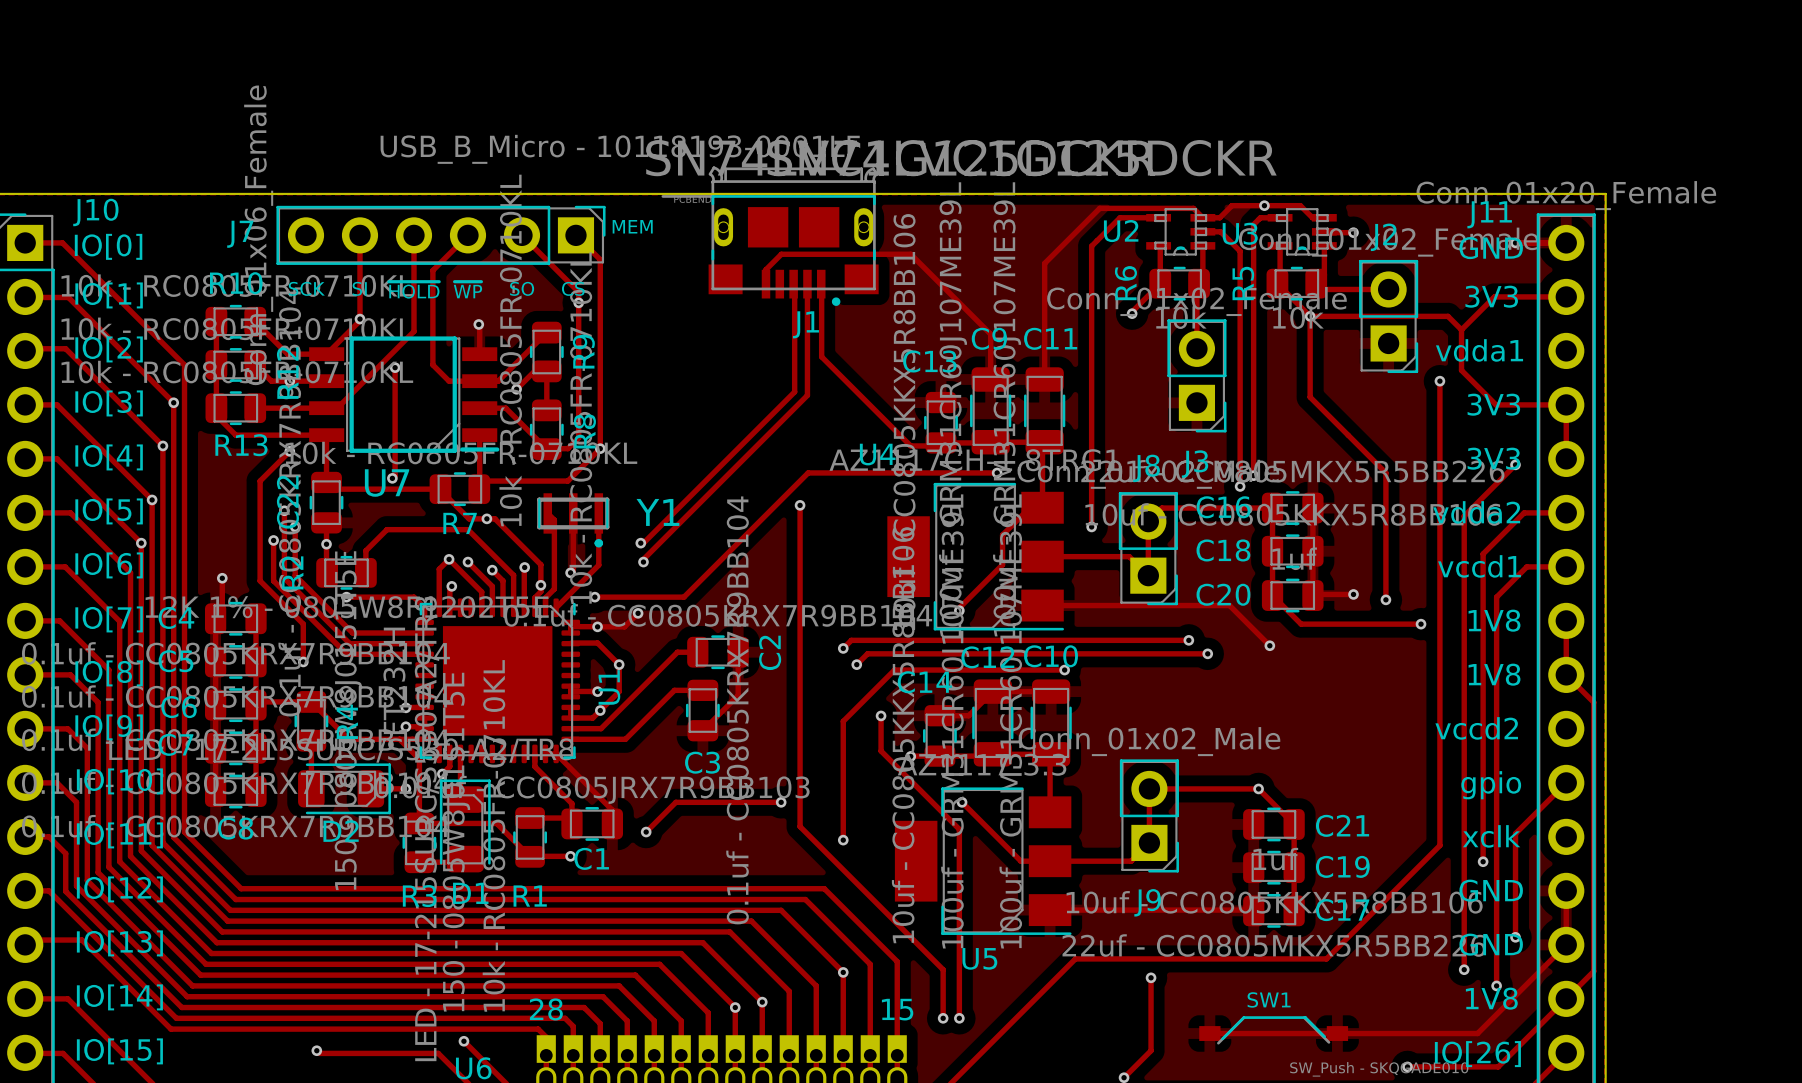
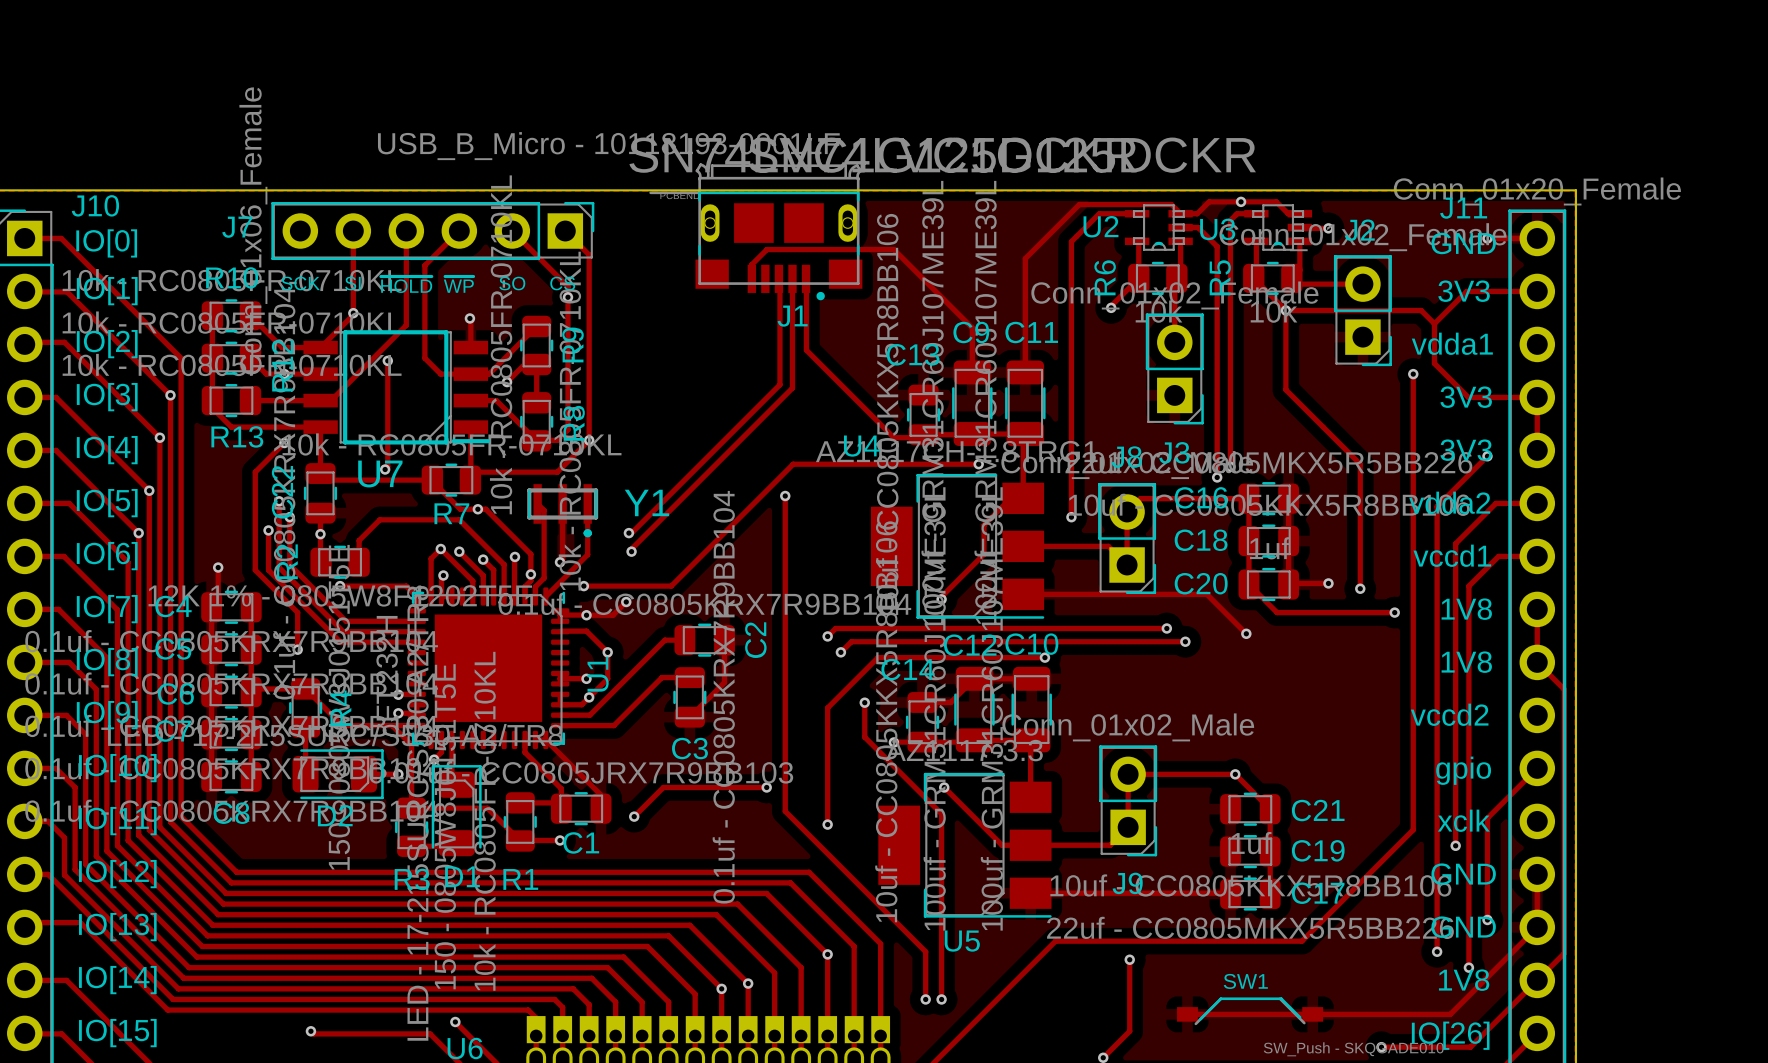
text: MEM (632, 226) -> none
text: 28 (546, 1009) -> none
text: 15 (897, 1009) -> none

